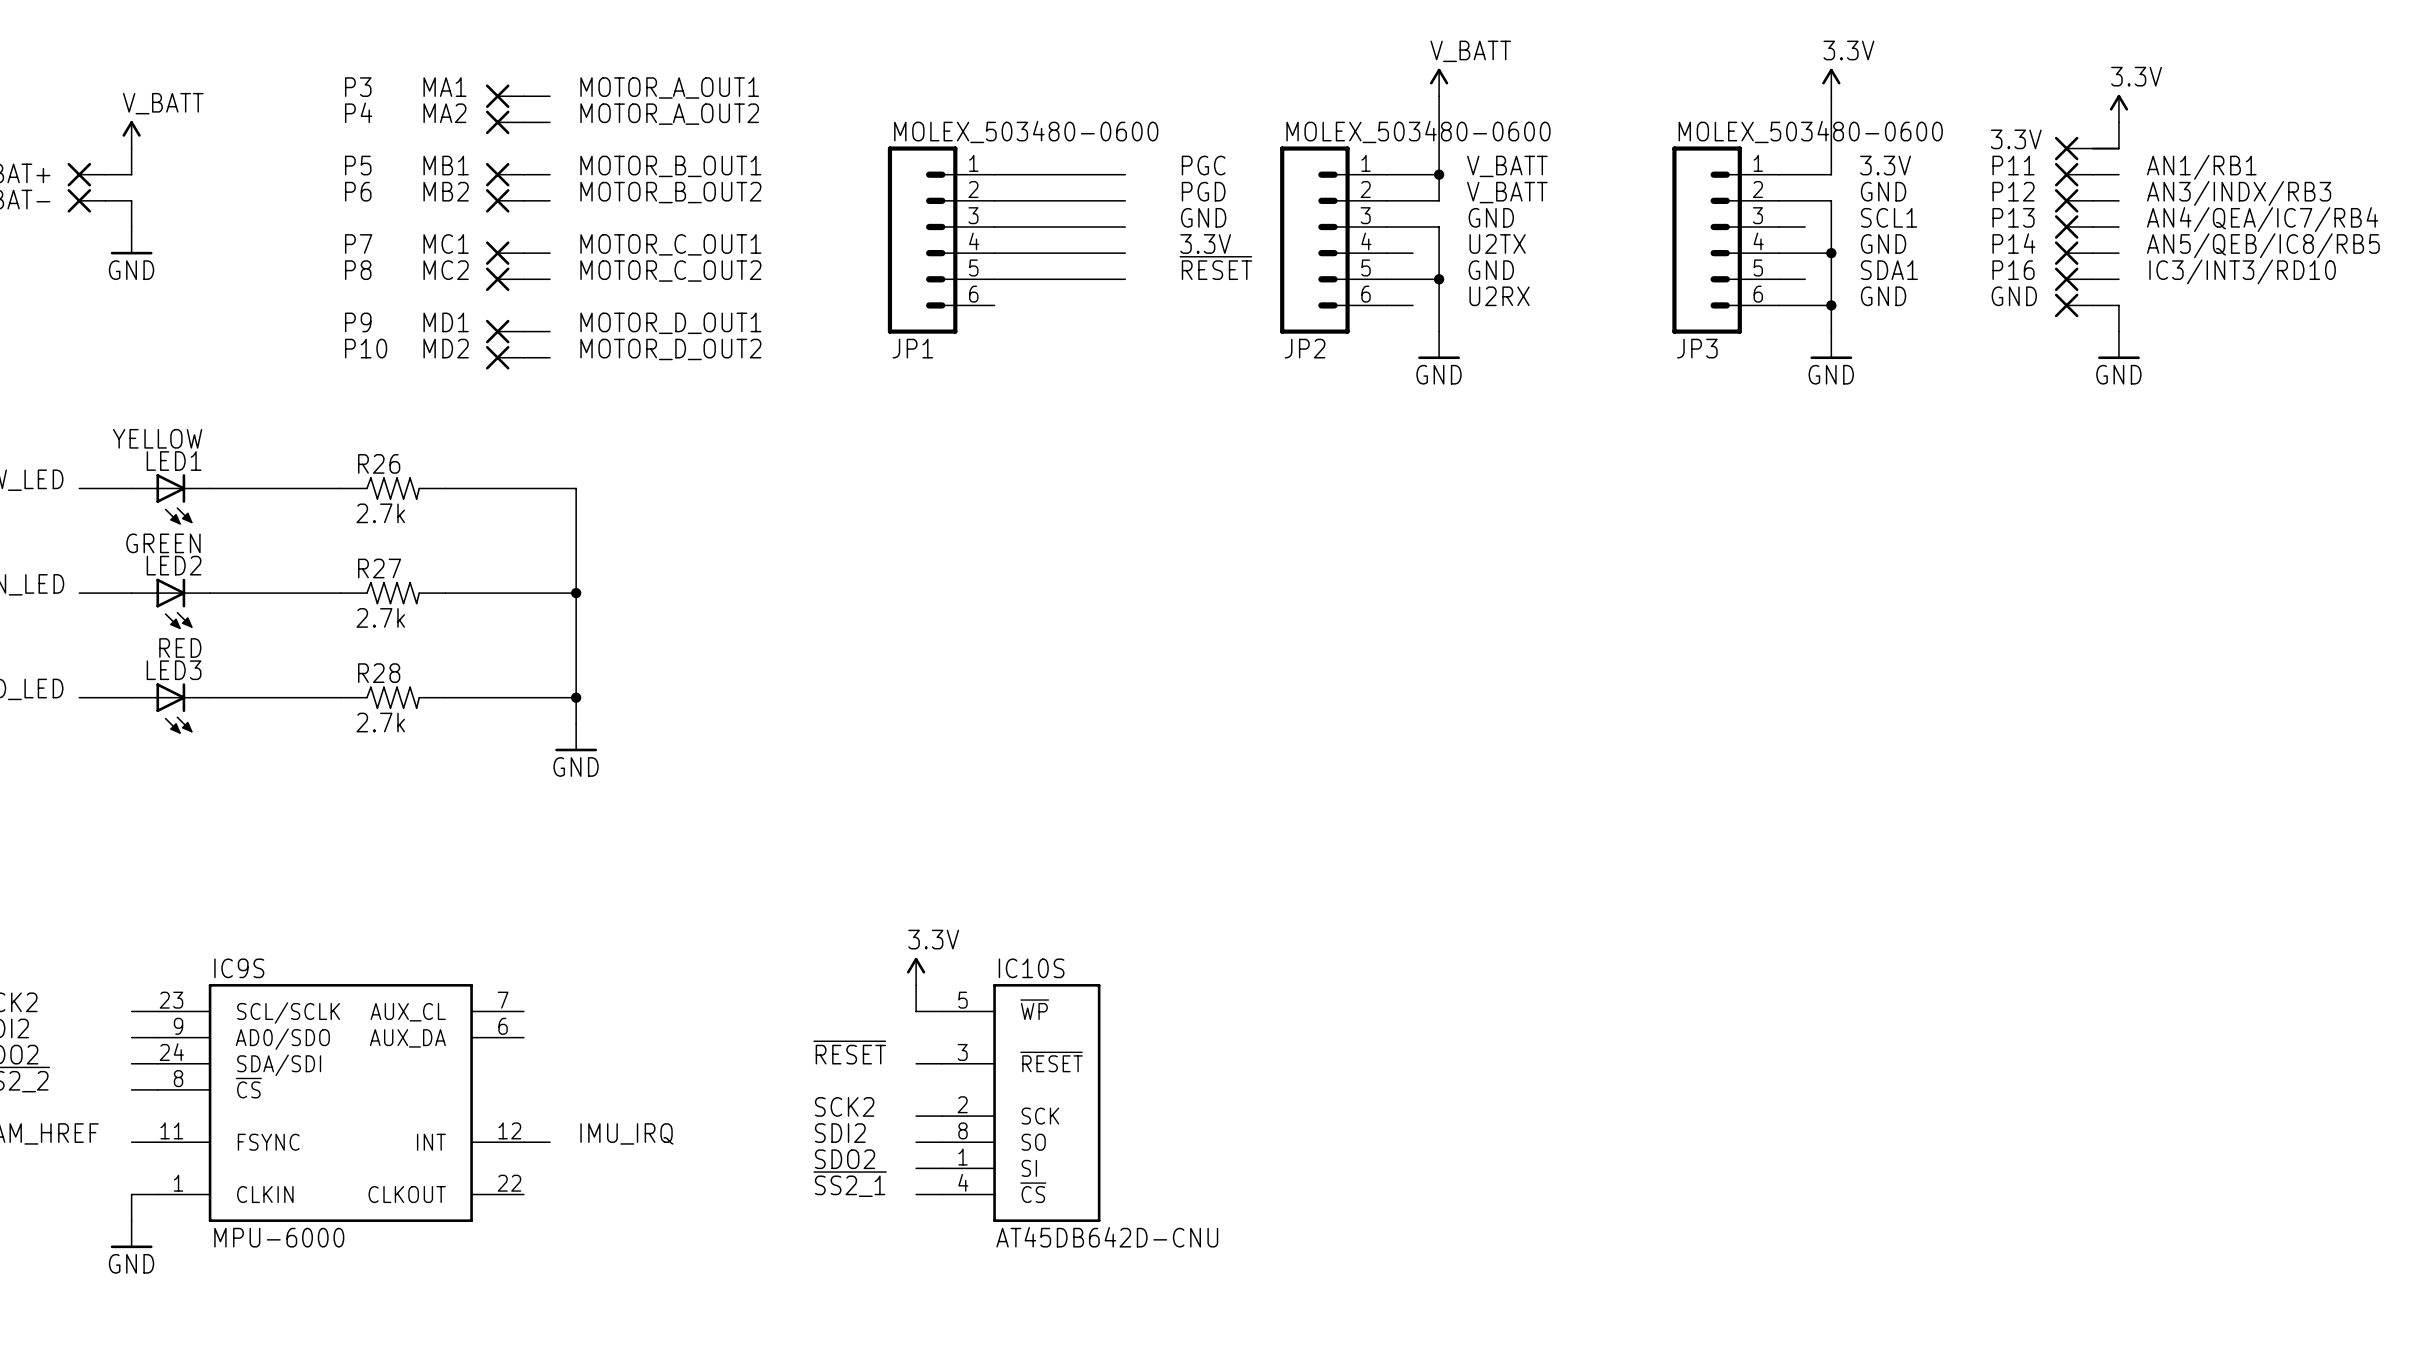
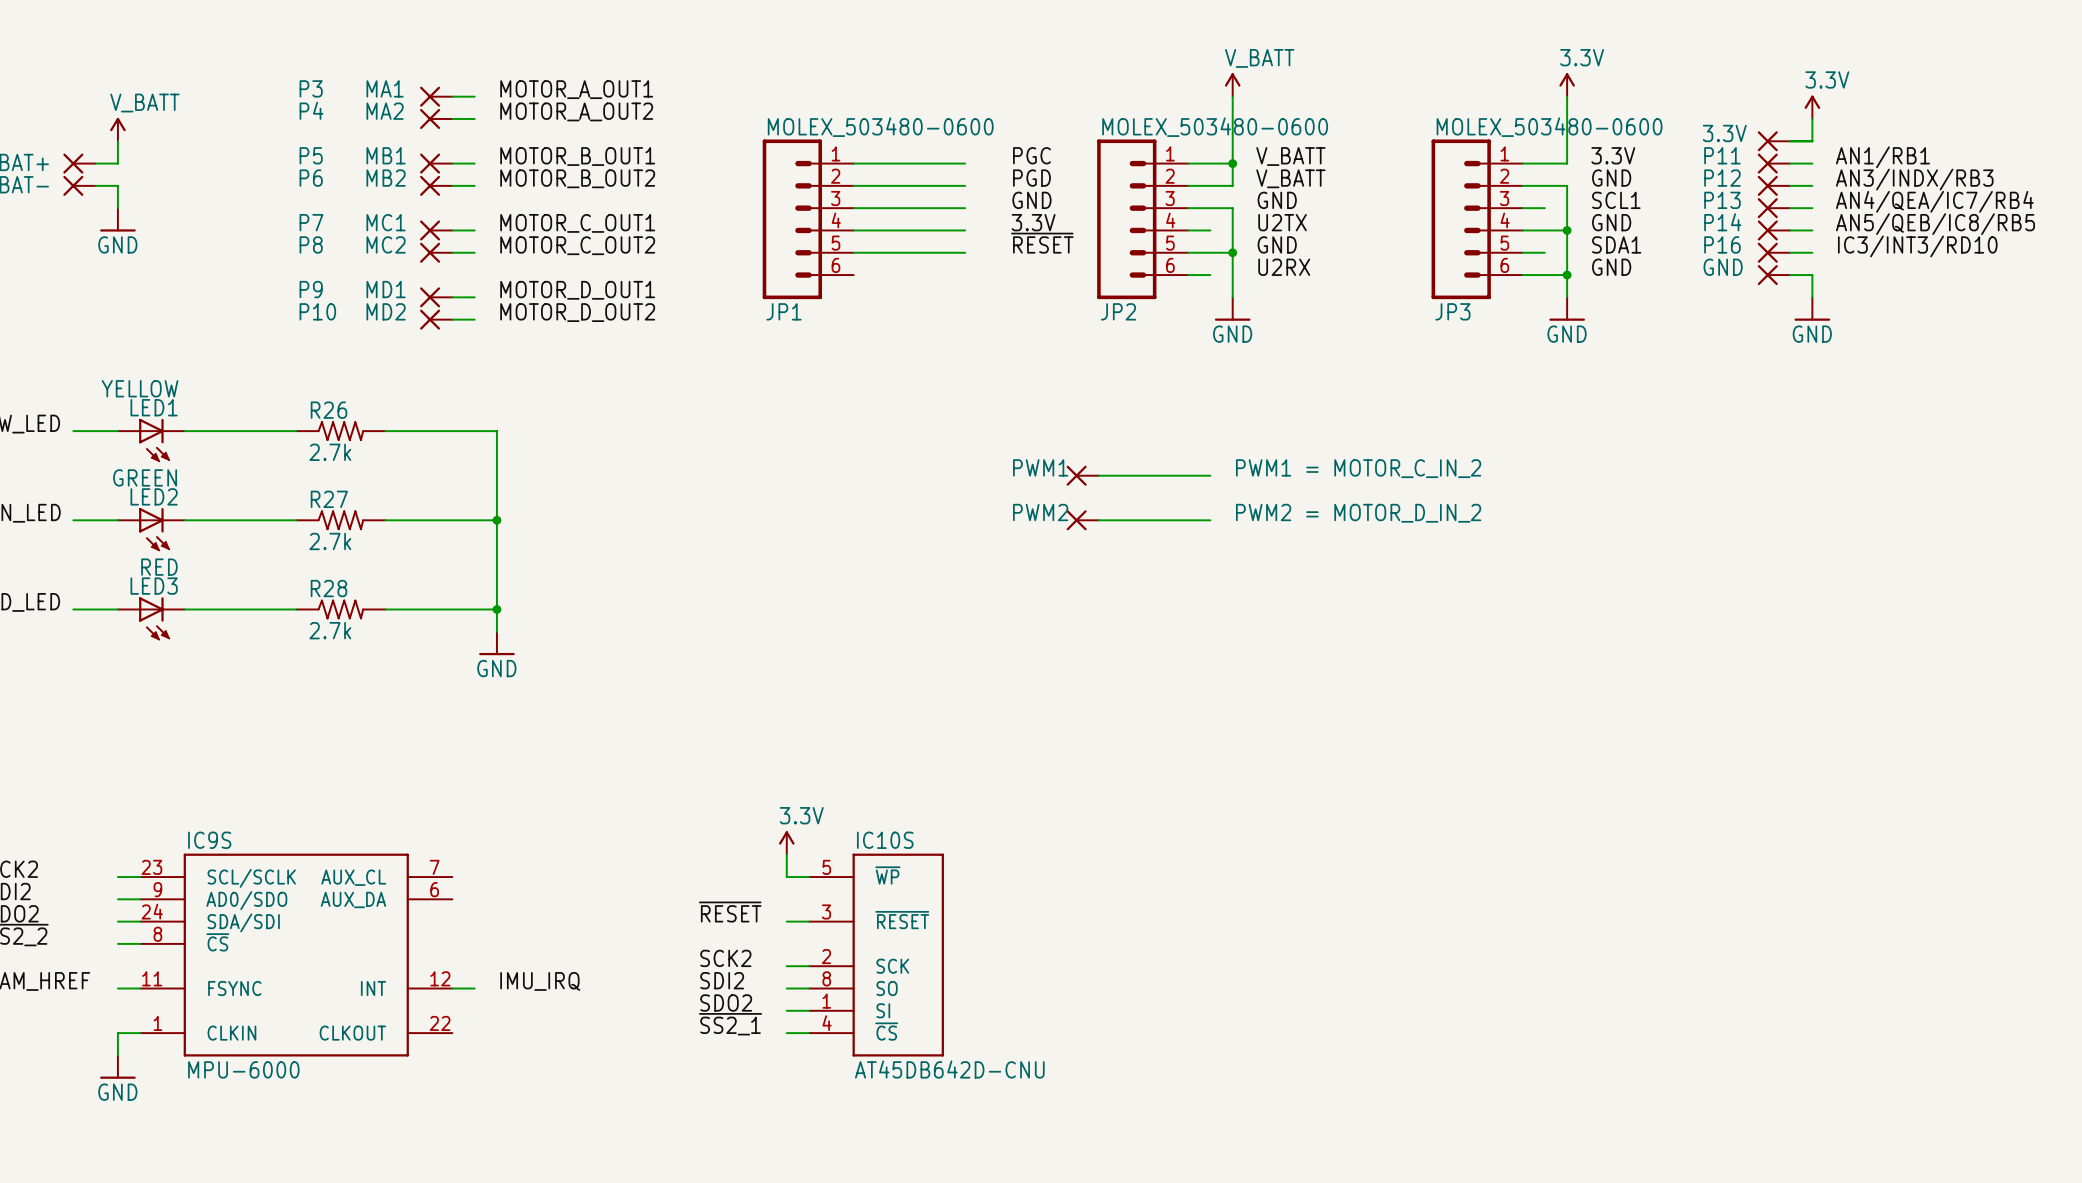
PWM1: none -> (1082, 475)
wire: none -> (1098, 475) (1210, 475)
PWM2: none -> (1082, 520)
wire: none -> (1098, 520) (1210, 520)

